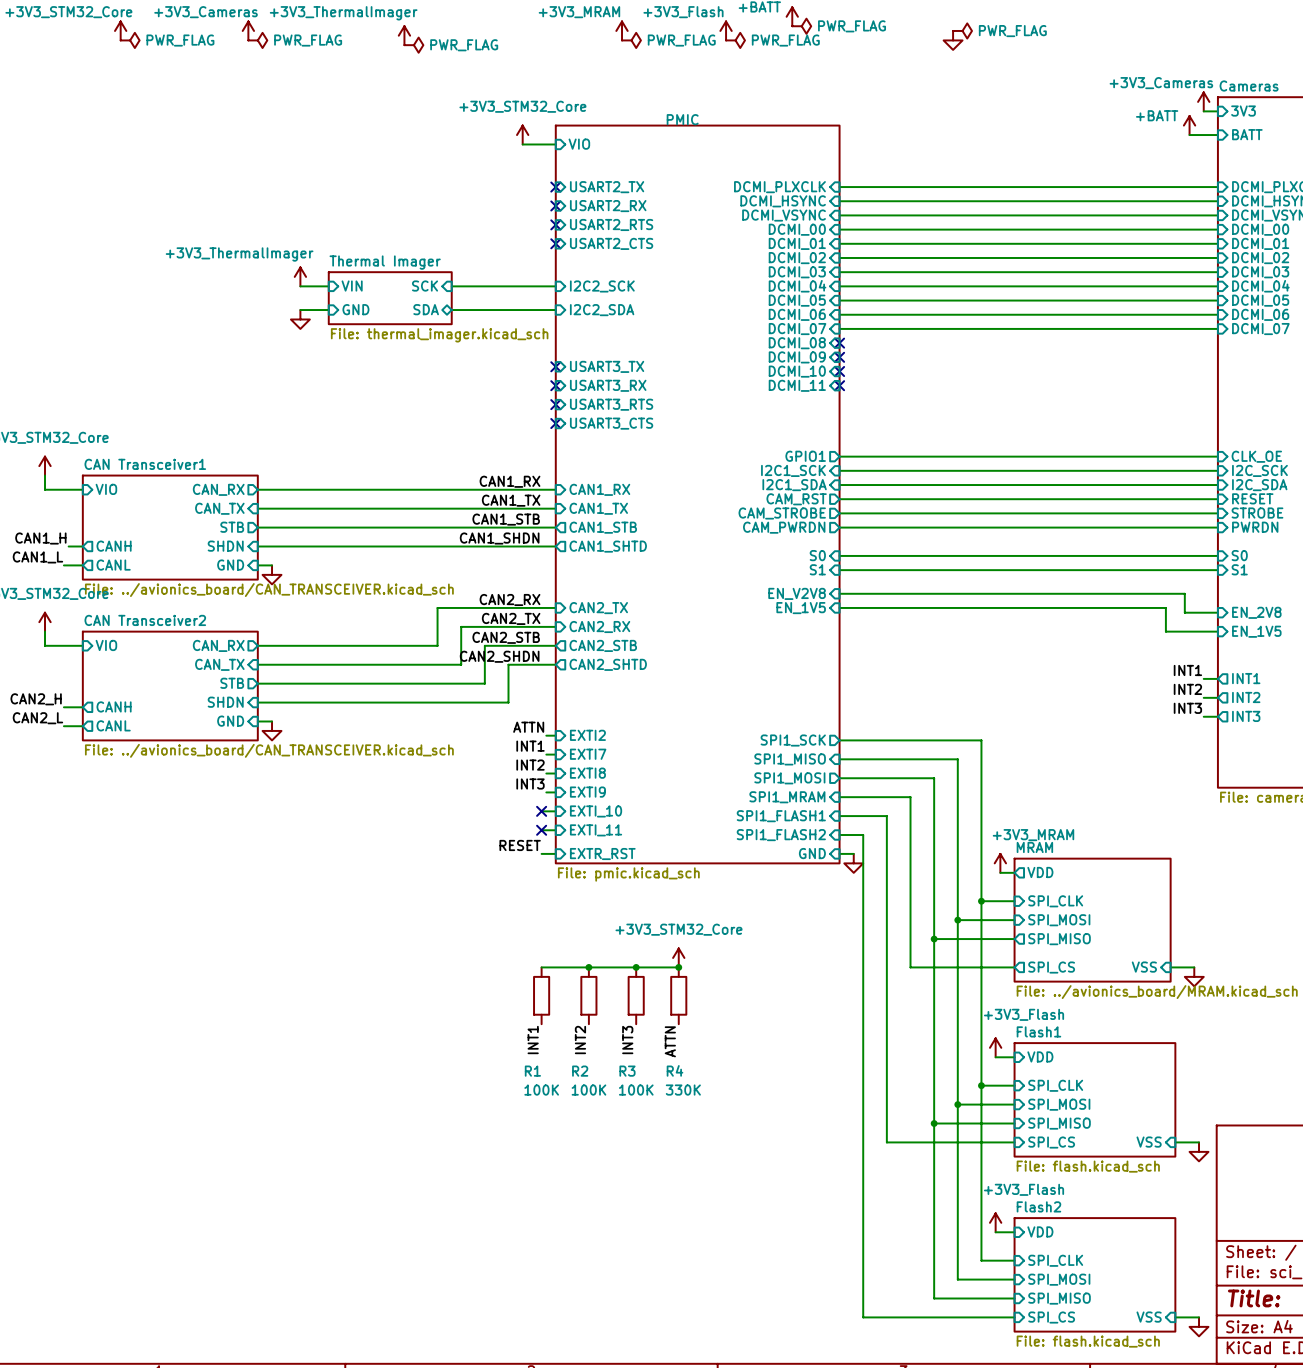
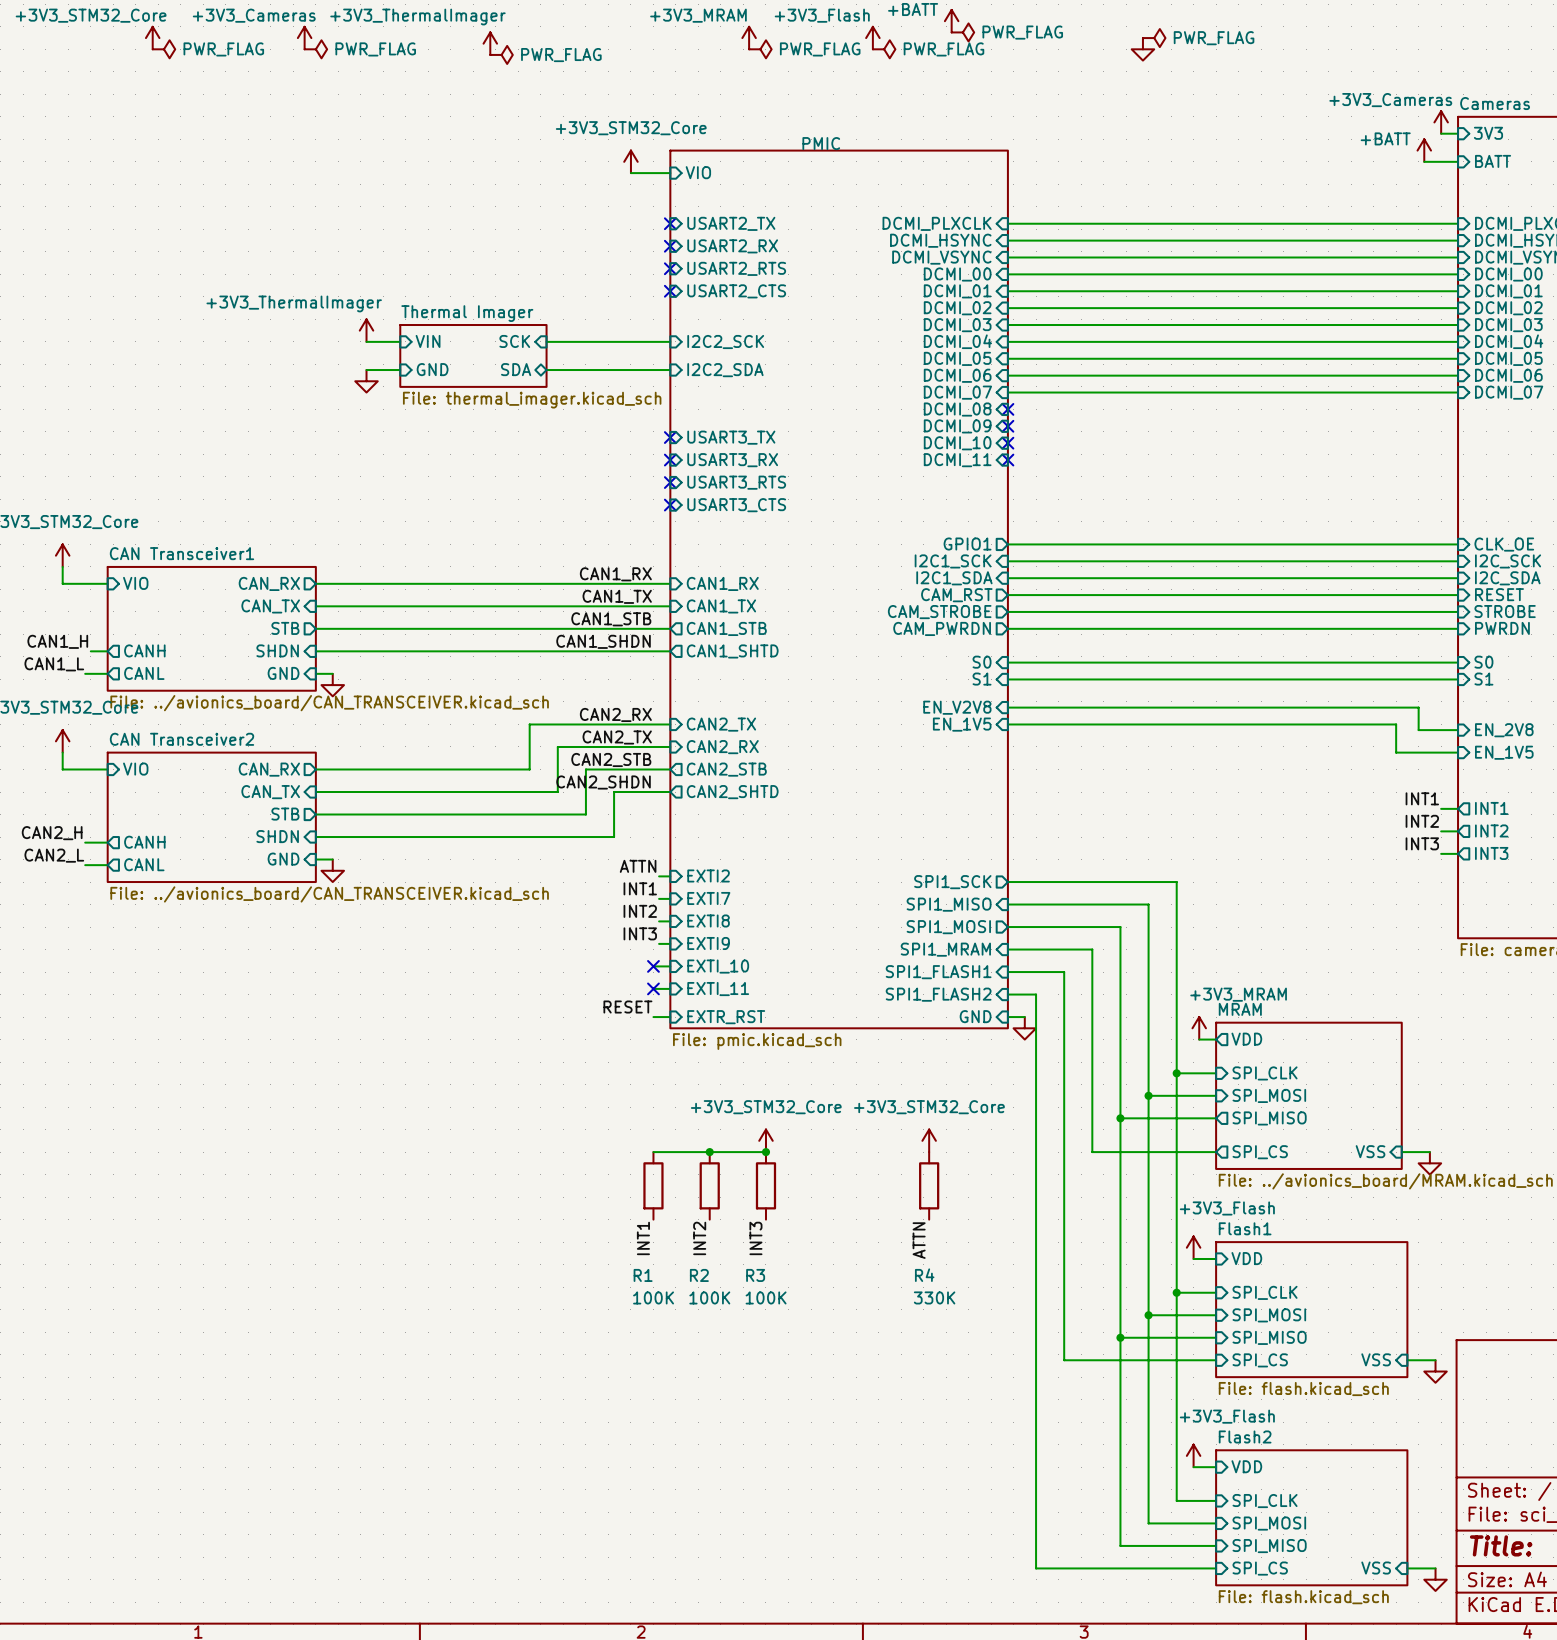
power symbol position: +3V3_STM32_Core (678, 957) -> +3V3_STM32_Core (765, 1140)
power symbol: none -> +3V3_STM32_Core (929, 1140)
wire: (636, 967) (678, 967) -> none
junction: (678, 967) -> none
R4 position: (678, 995) -> (929, 1185)
label position: ATTN (670, 1041) -> ATTN (919, 1240)

